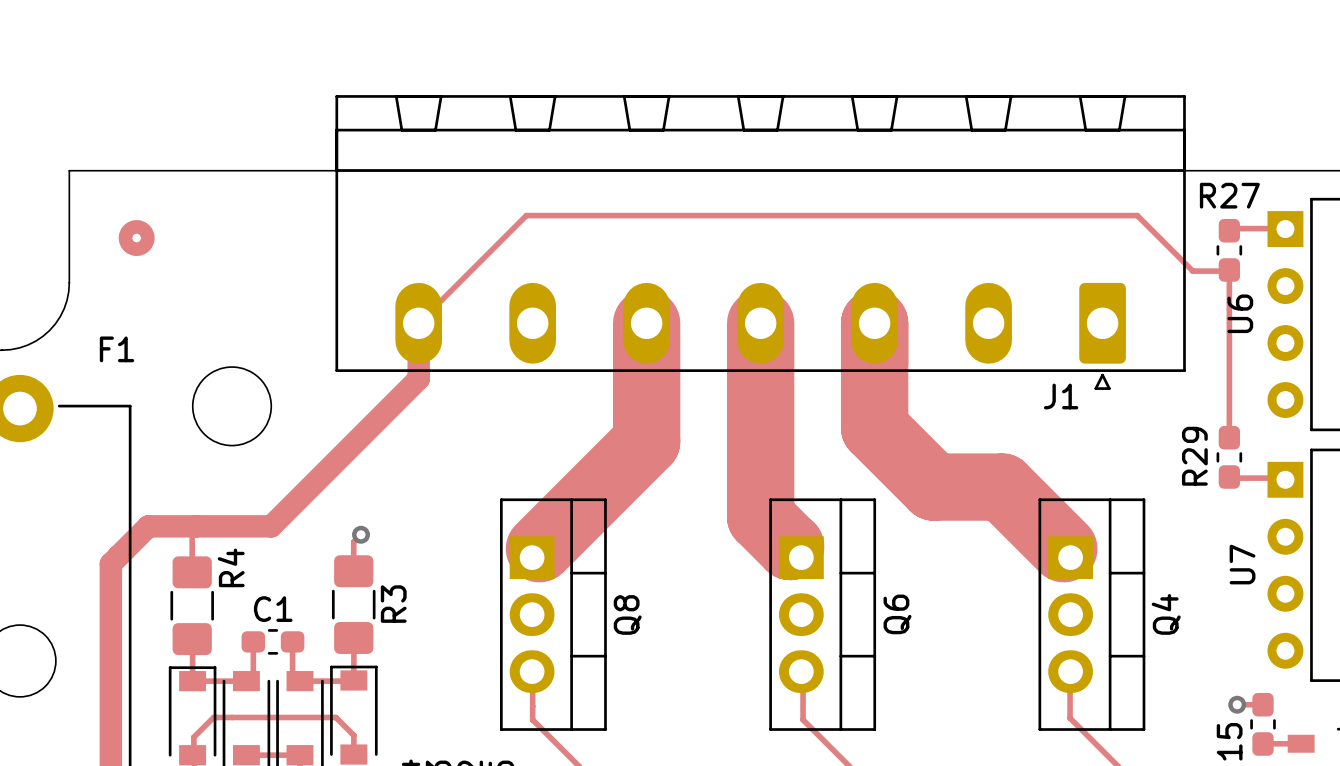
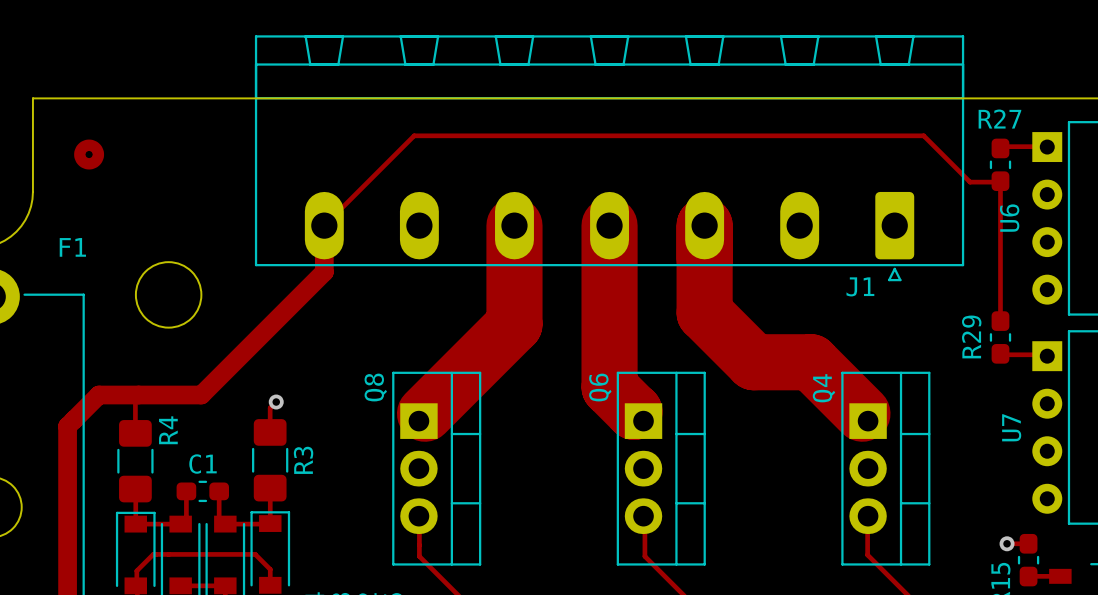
Q8 name position: Q8 (627, 614) -> Q8 (375, 387)
Q6 name position: Q6 (897, 614) -> Q6 (600, 387)
Q4 name position: Q4 (1166, 614) -> Q4 (823, 388)

